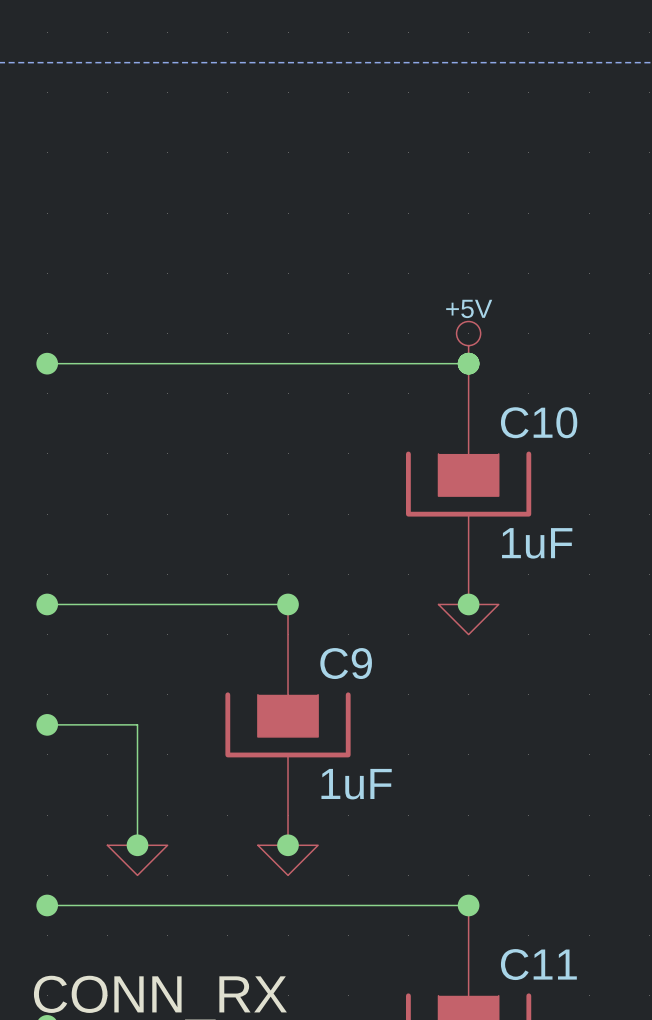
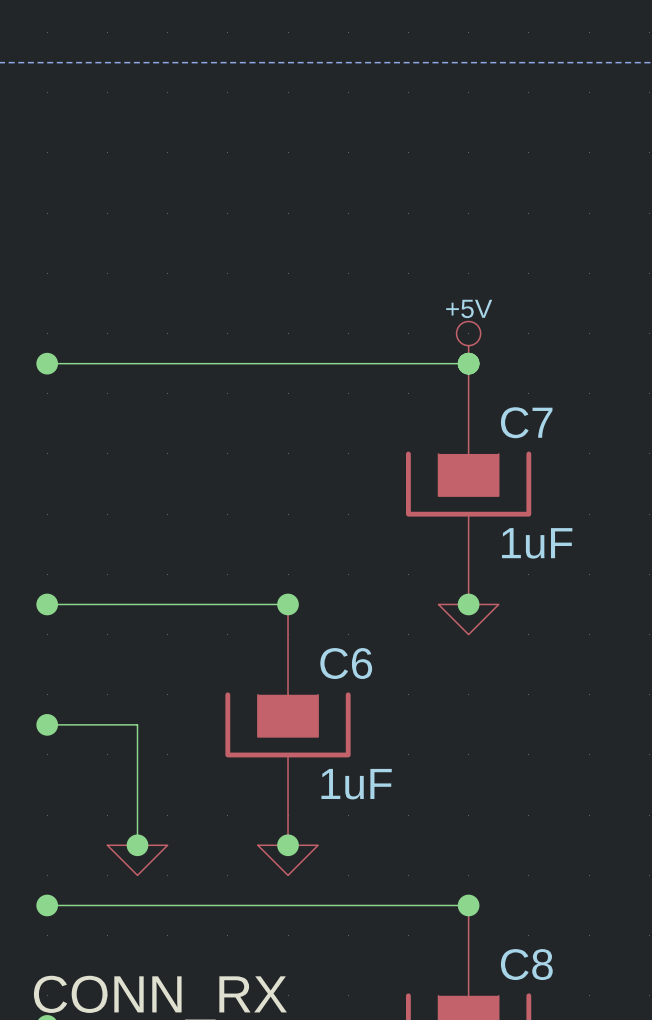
C10 name: C10 (539, 422) -> C7 (526, 422)
C9 name: C9 (346, 663) -> C6 (346, 663)
C11 name: C11 (538, 964) -> C8 (526, 964)

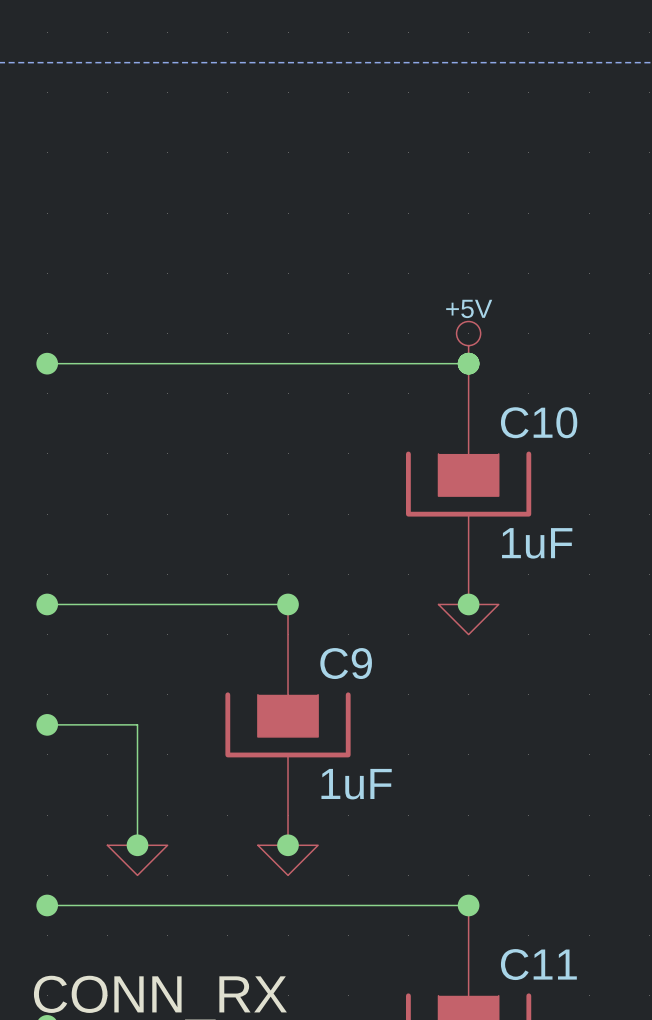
C7 name: C7 (526, 422) -> C10 (539, 422)
C6 name: C6 (346, 663) -> C9 (346, 663)
C8 name: C8 (526, 964) -> C11 (538, 964)

